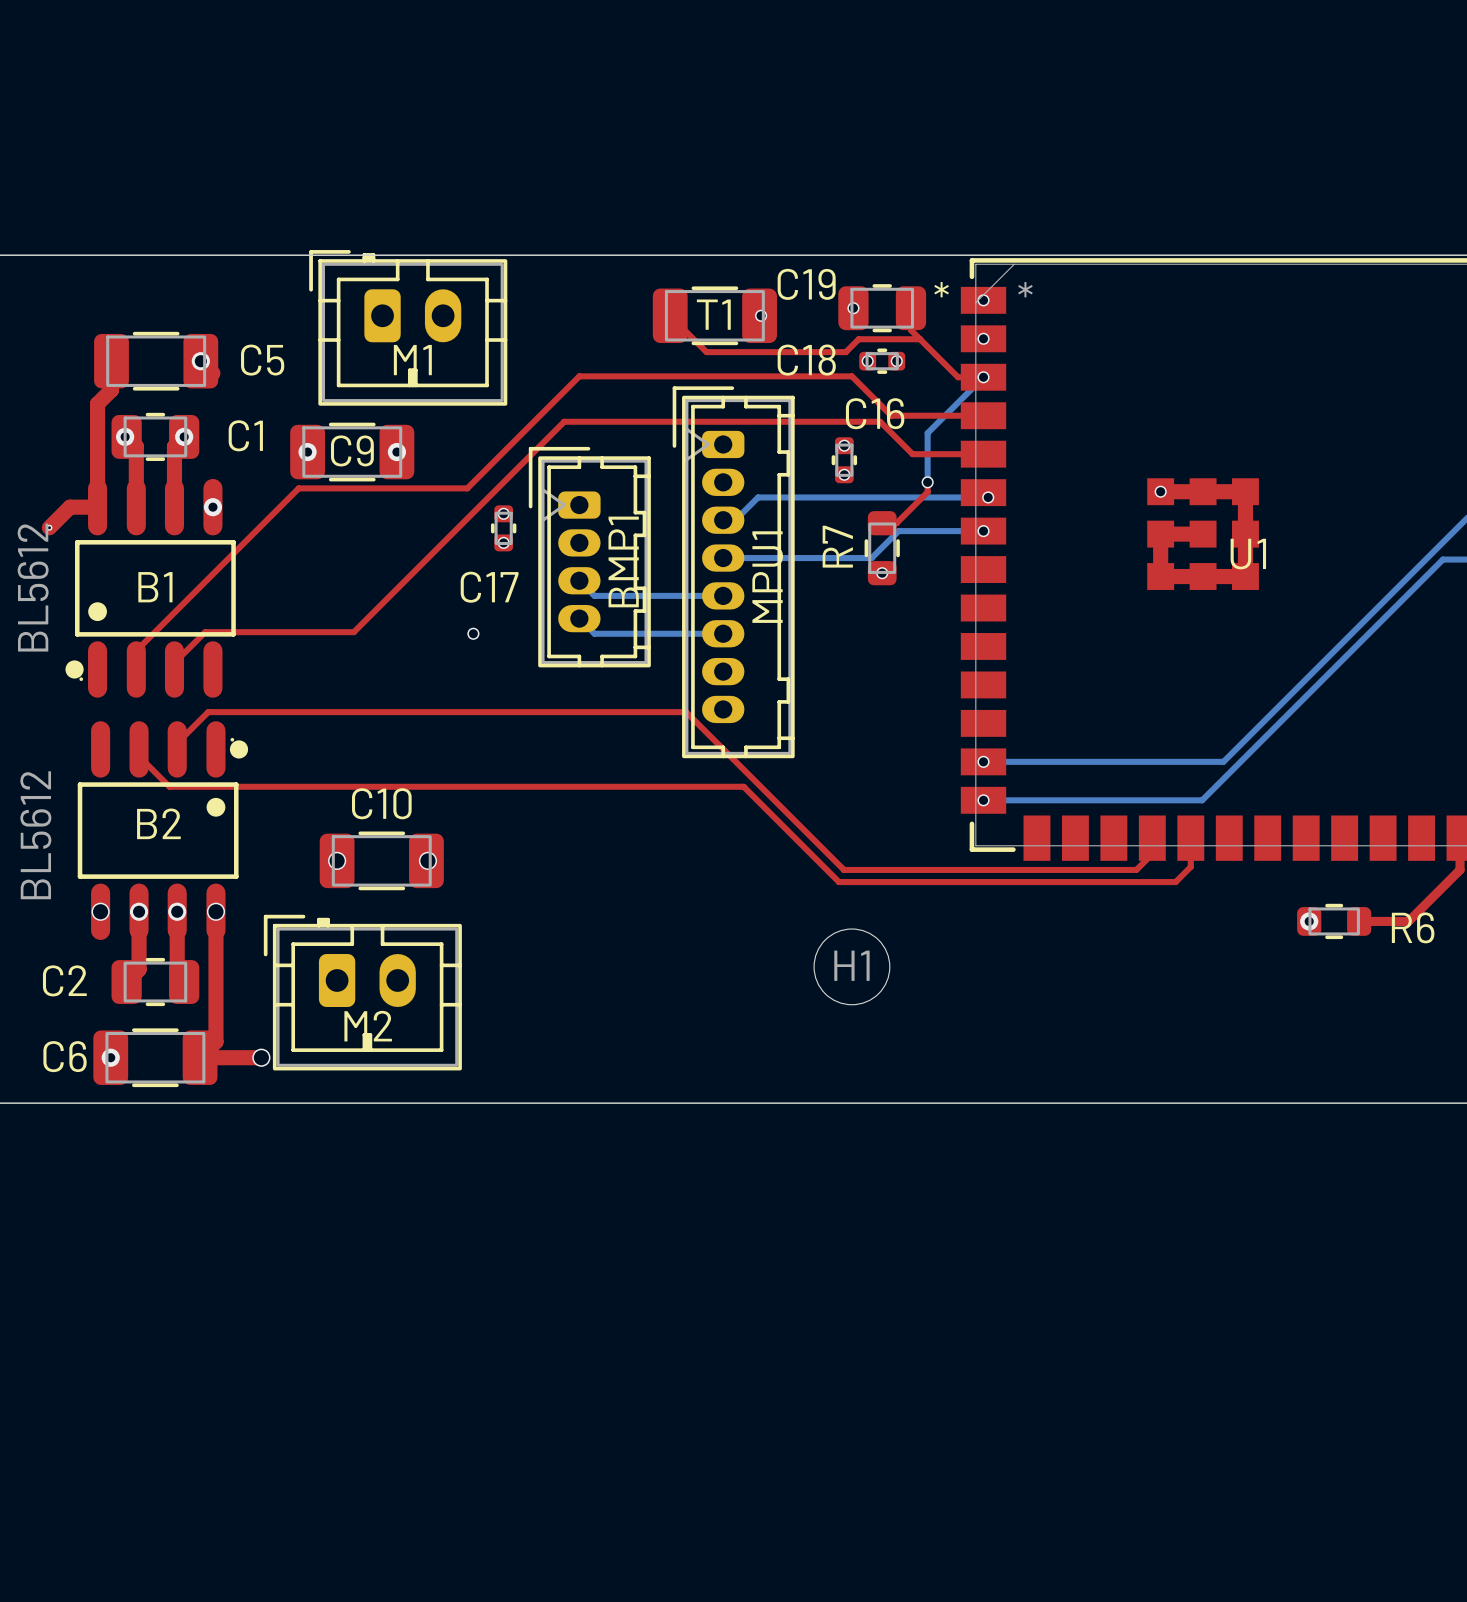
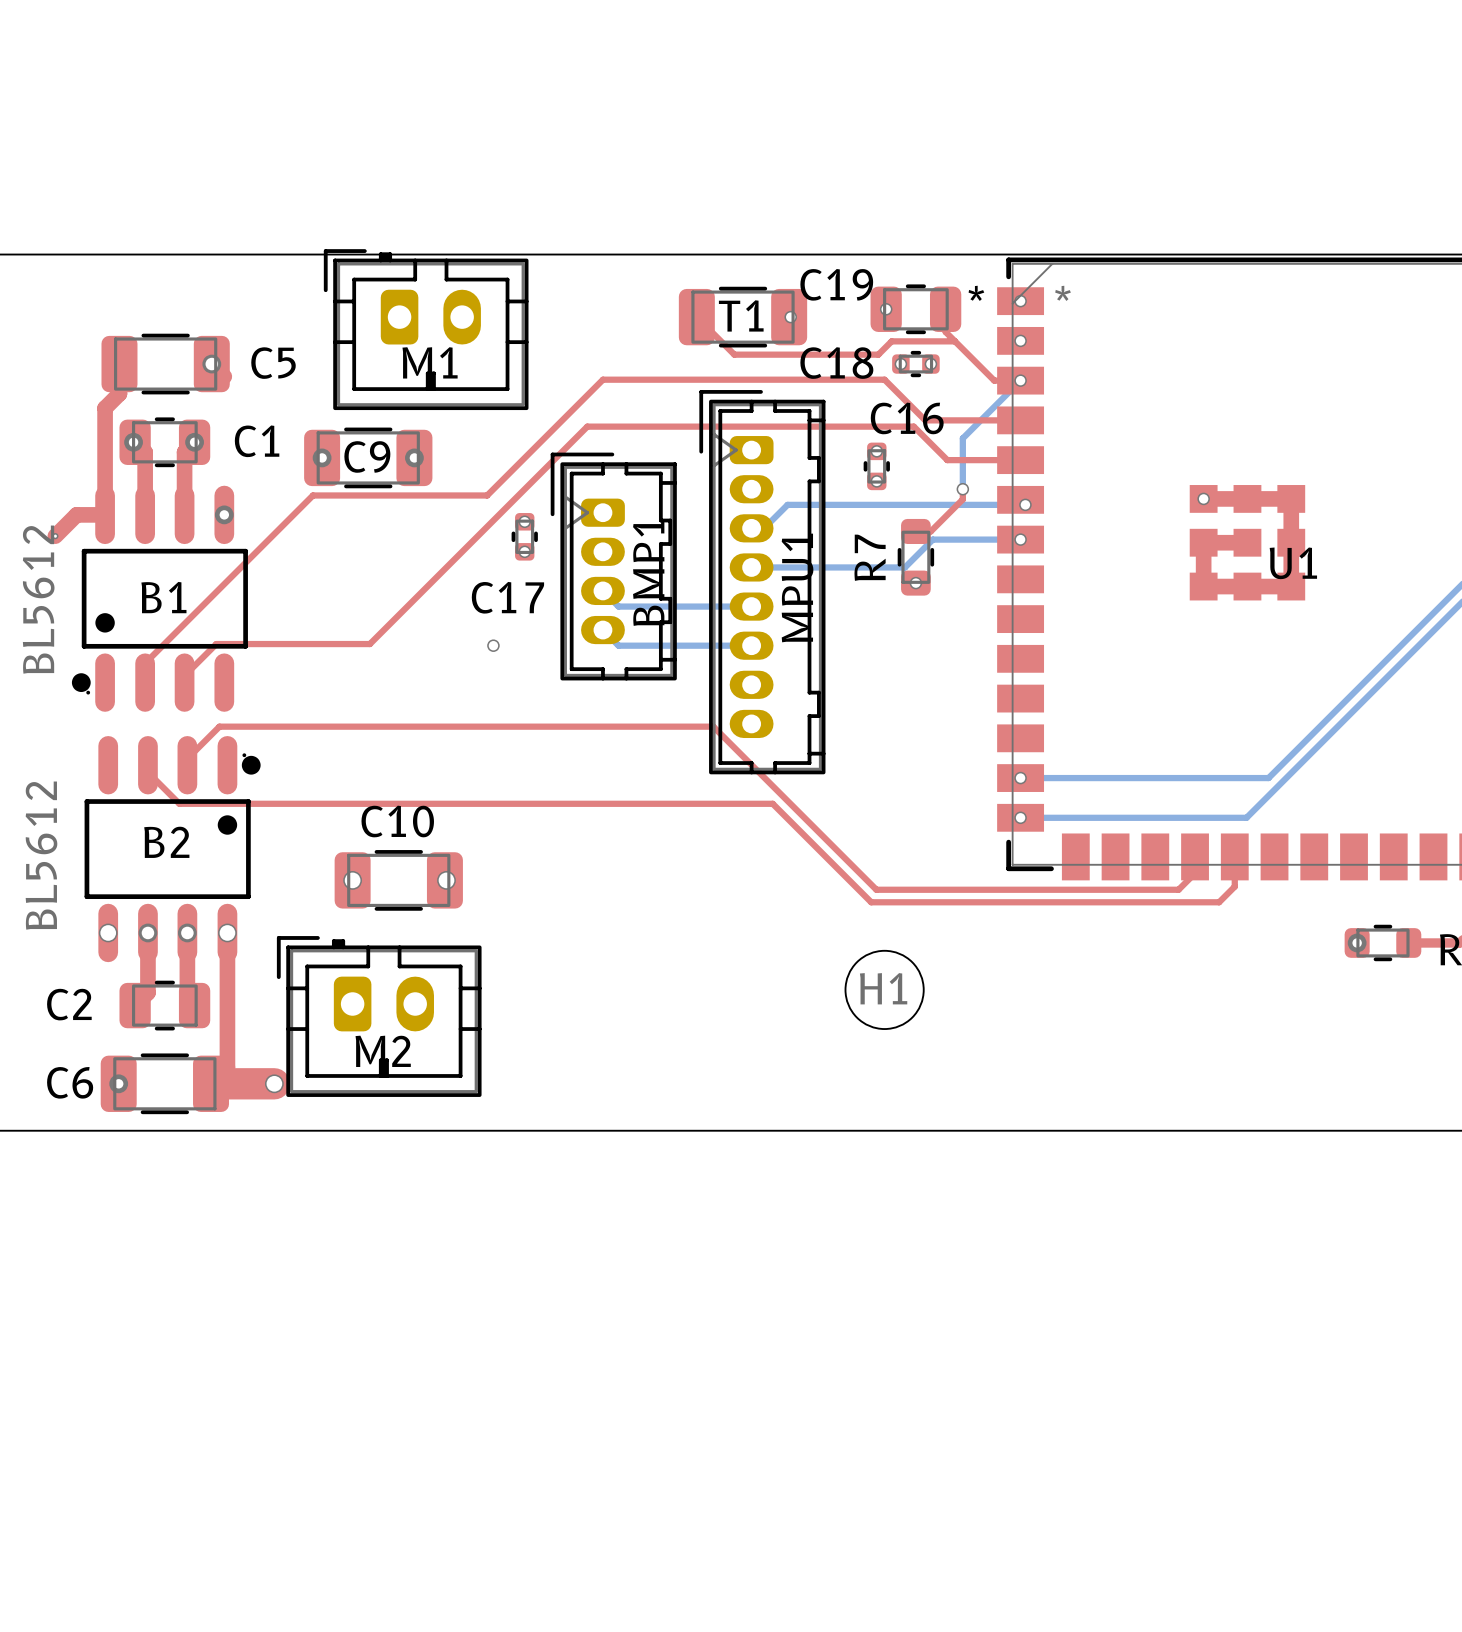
top track width: thin (200, 1057) (261, 1057) -> thick (211, 1083) (274, 1083)

